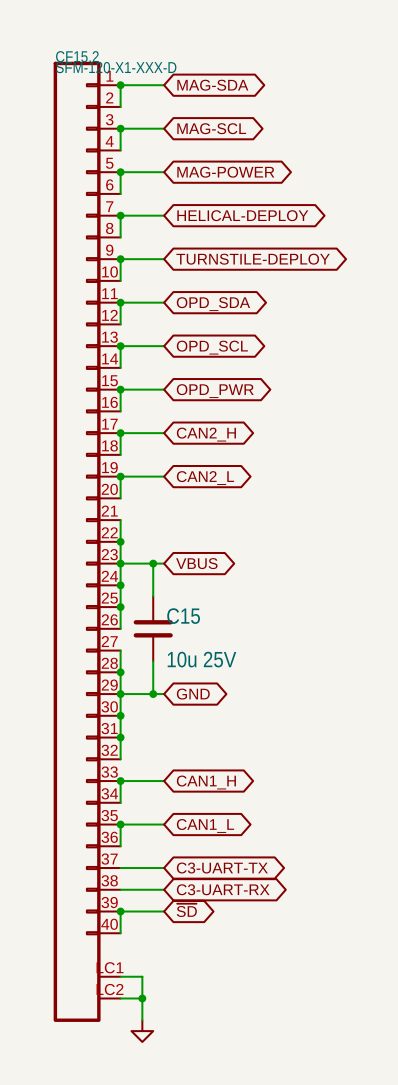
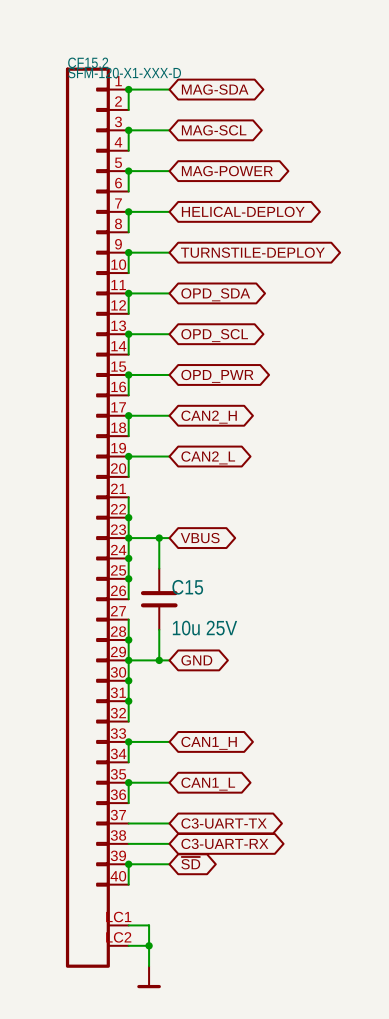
power symbol shape: [131, 1020, 154, 1042] -> [137, 966, 161, 989]

